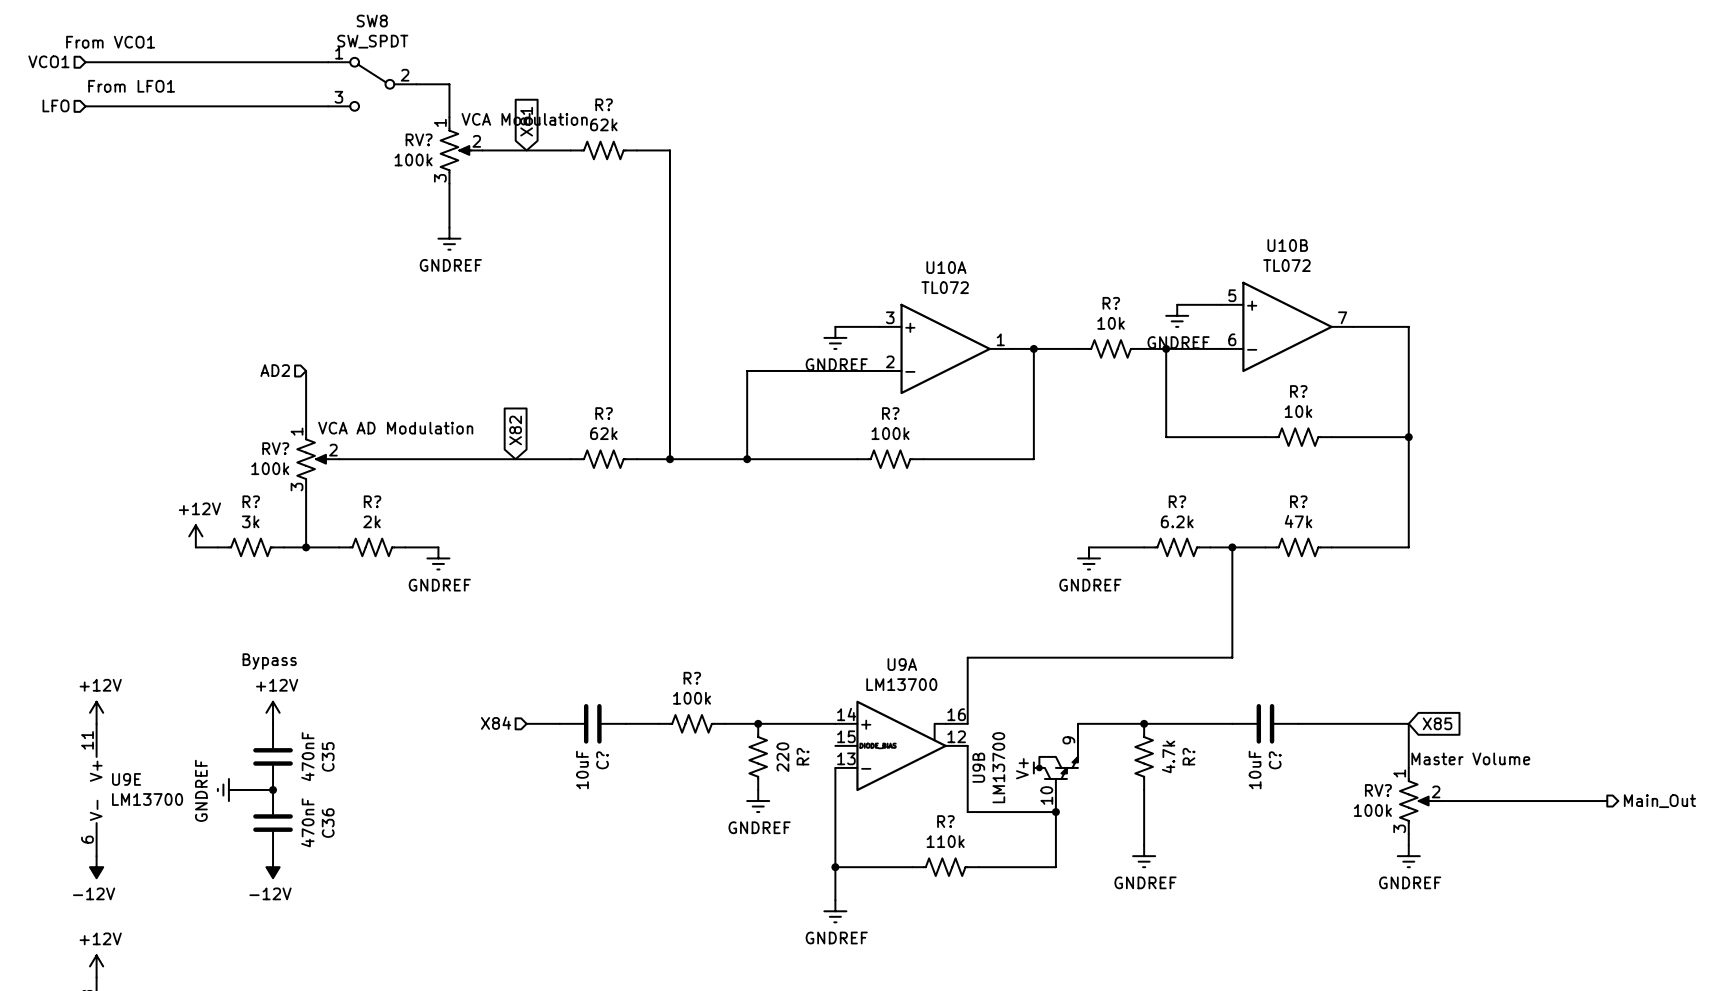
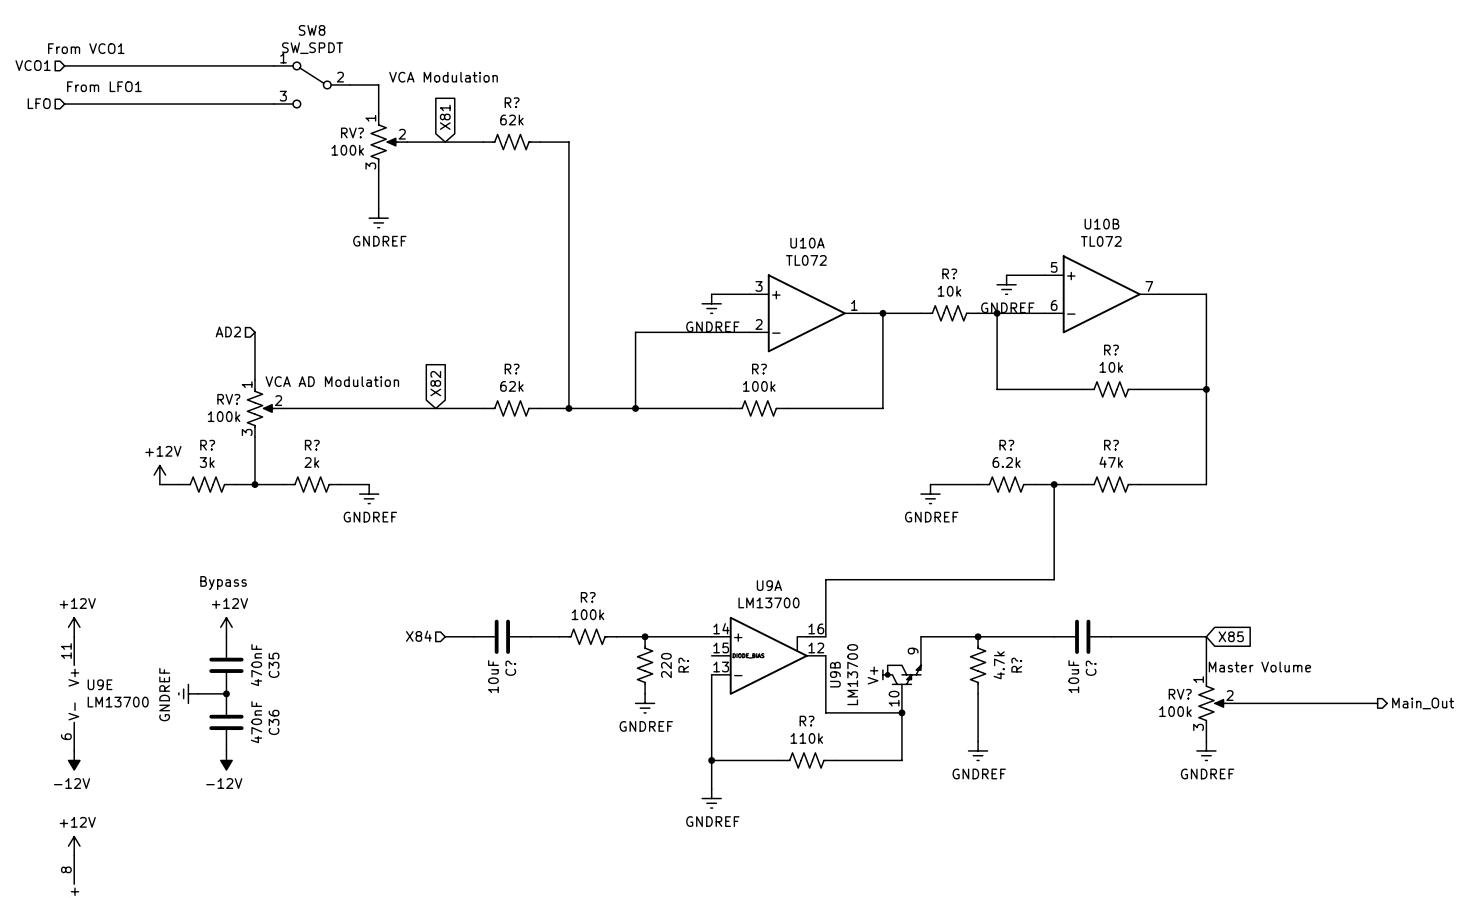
text position: VCA Modulation (524, 119) -> VCA Modulation (443, 77)

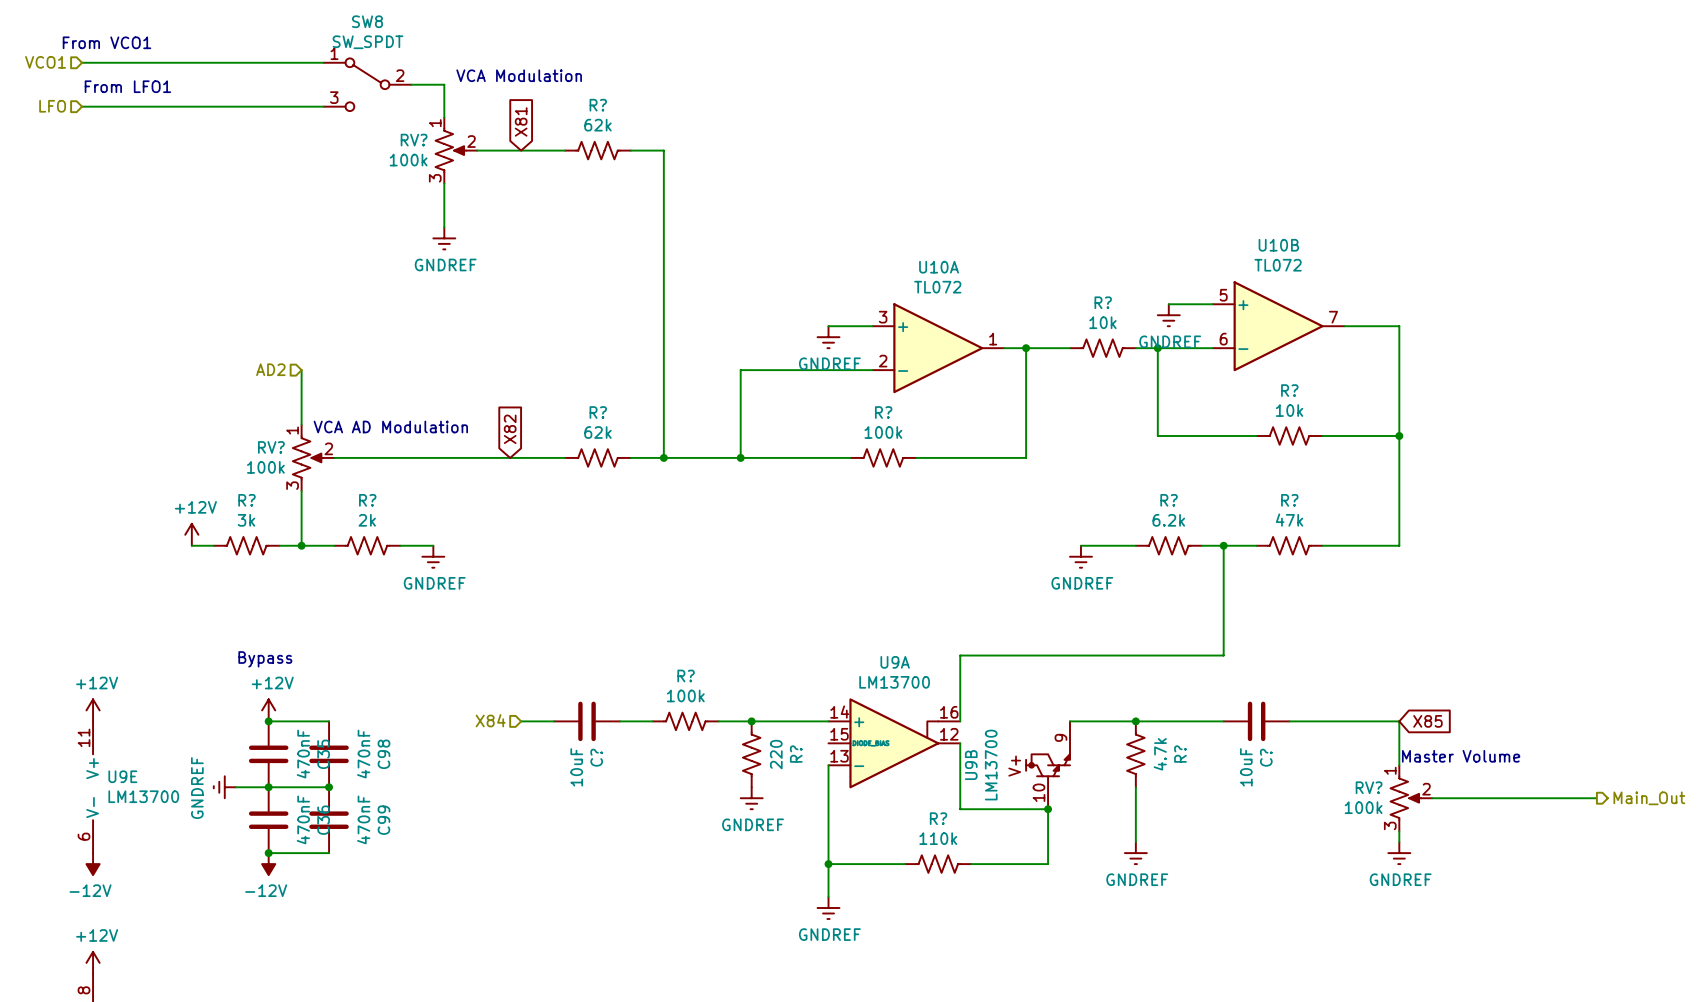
wire: none -> (268, 721) (329, 721)
junction: none -> (268, 721)
C98: none -> 470nF (329, 754)
wire: none -> (268, 787) (329, 787)
junction: none -> (329, 787)
C99: none -> 470nF (329, 820)
wire: none -> (268, 853) (329, 853)
junction: none -> (268, 853)

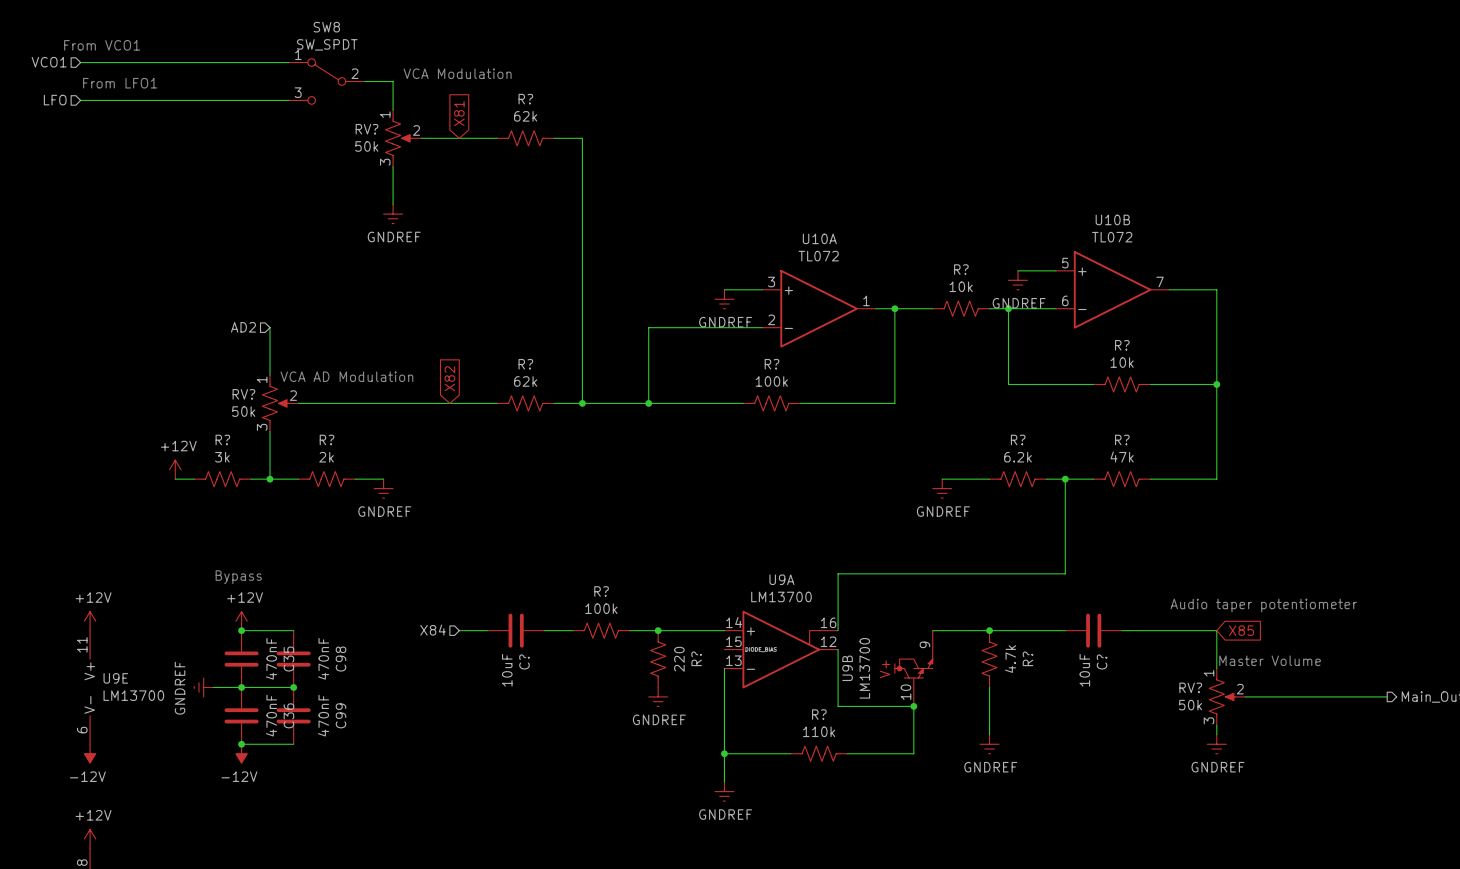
RV? value: 100k (408, 160) -> 50k (366, 146)
RV? value: 100k (265, 467) -> 50k (243, 411)
text: none -> Audio taper potentiometer (1263, 605)
RV? value: 100k (1363, 807) -> 50k (1190, 705)

